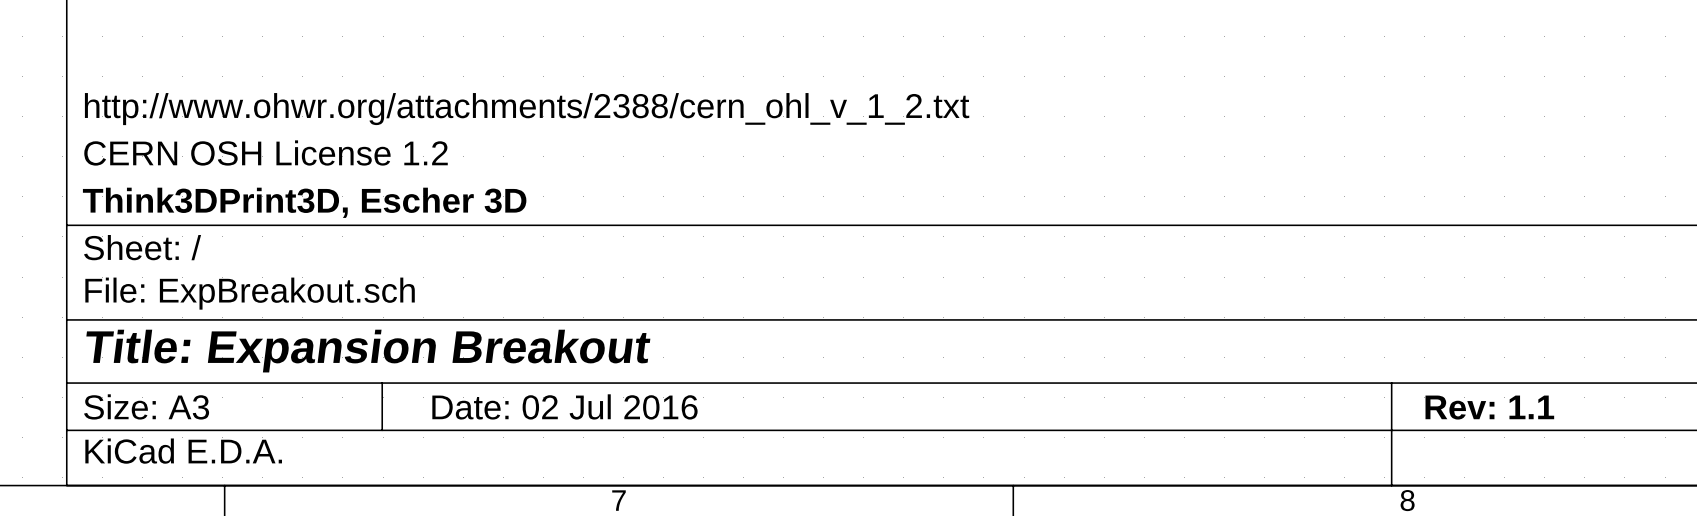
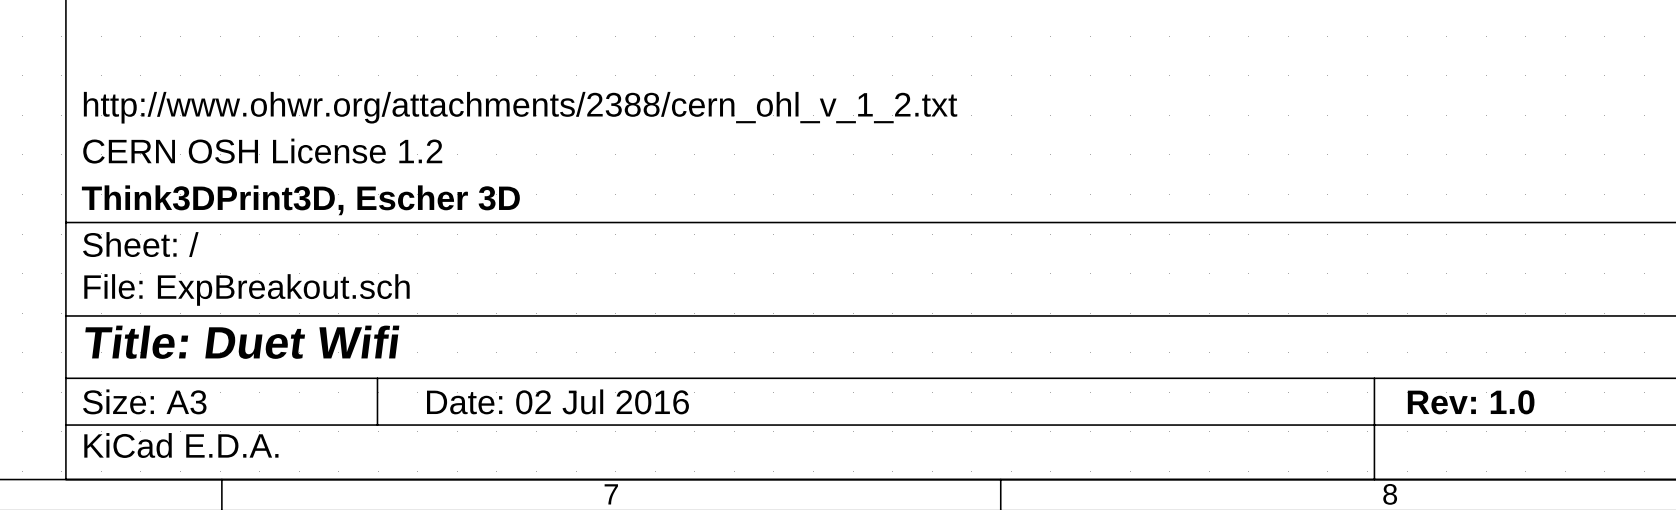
title block: Title: Expansion Breakout (368, 351) -> Title: Duet Wifi (242, 342)
title block: Rev: 1.1 (1489, 407) -> Rev: 1.0 (1471, 402)

